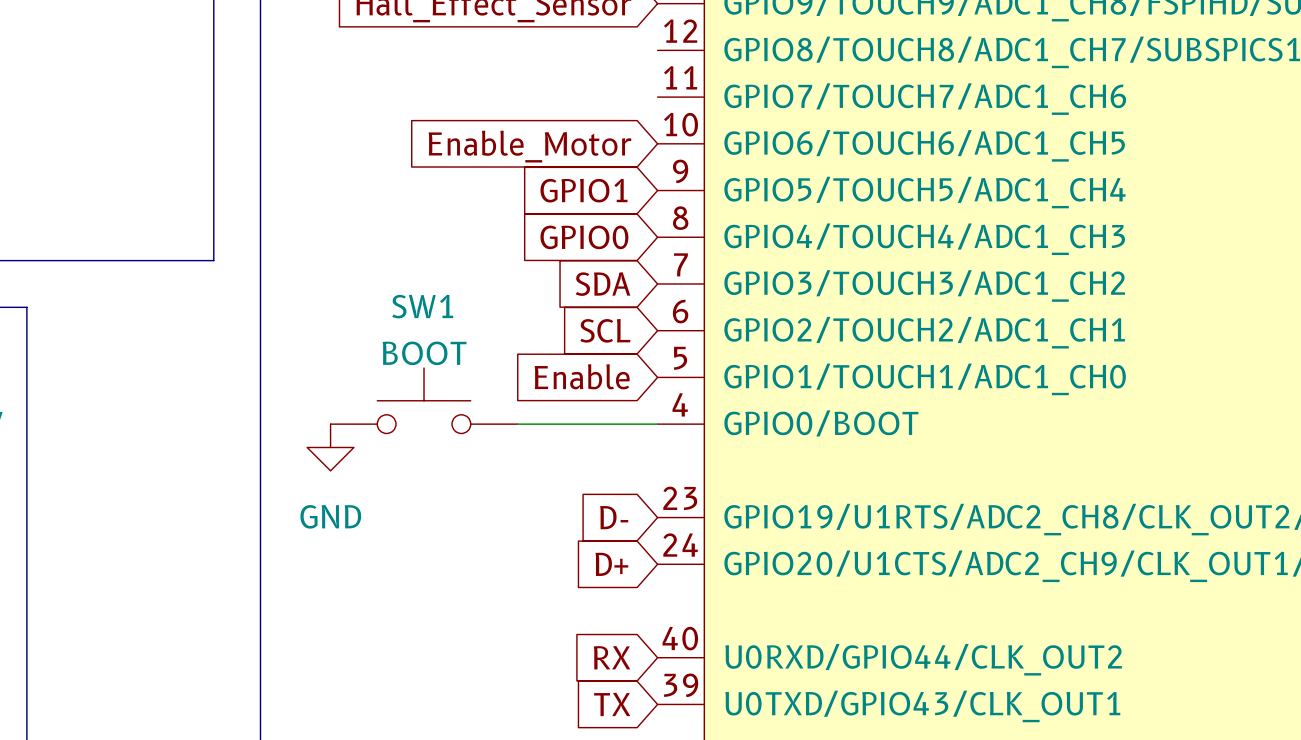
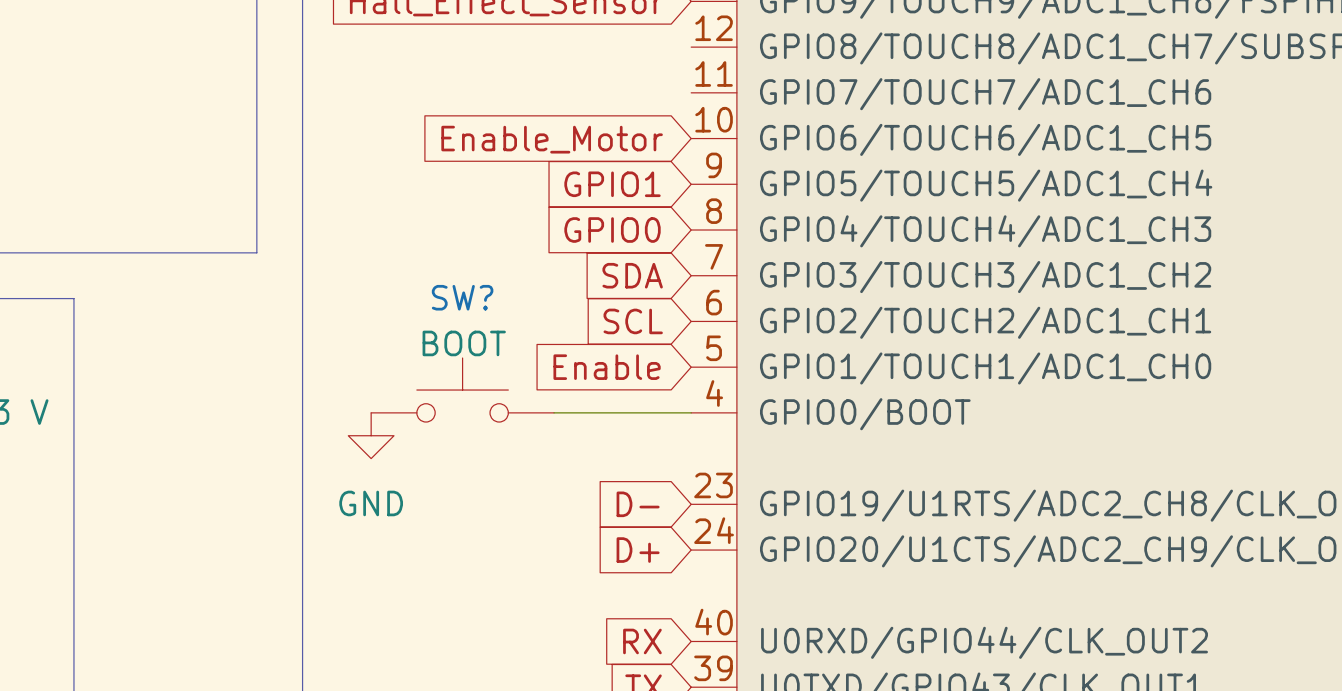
SW1 name: SW1 (422, 306) -> SW? (462, 297)

